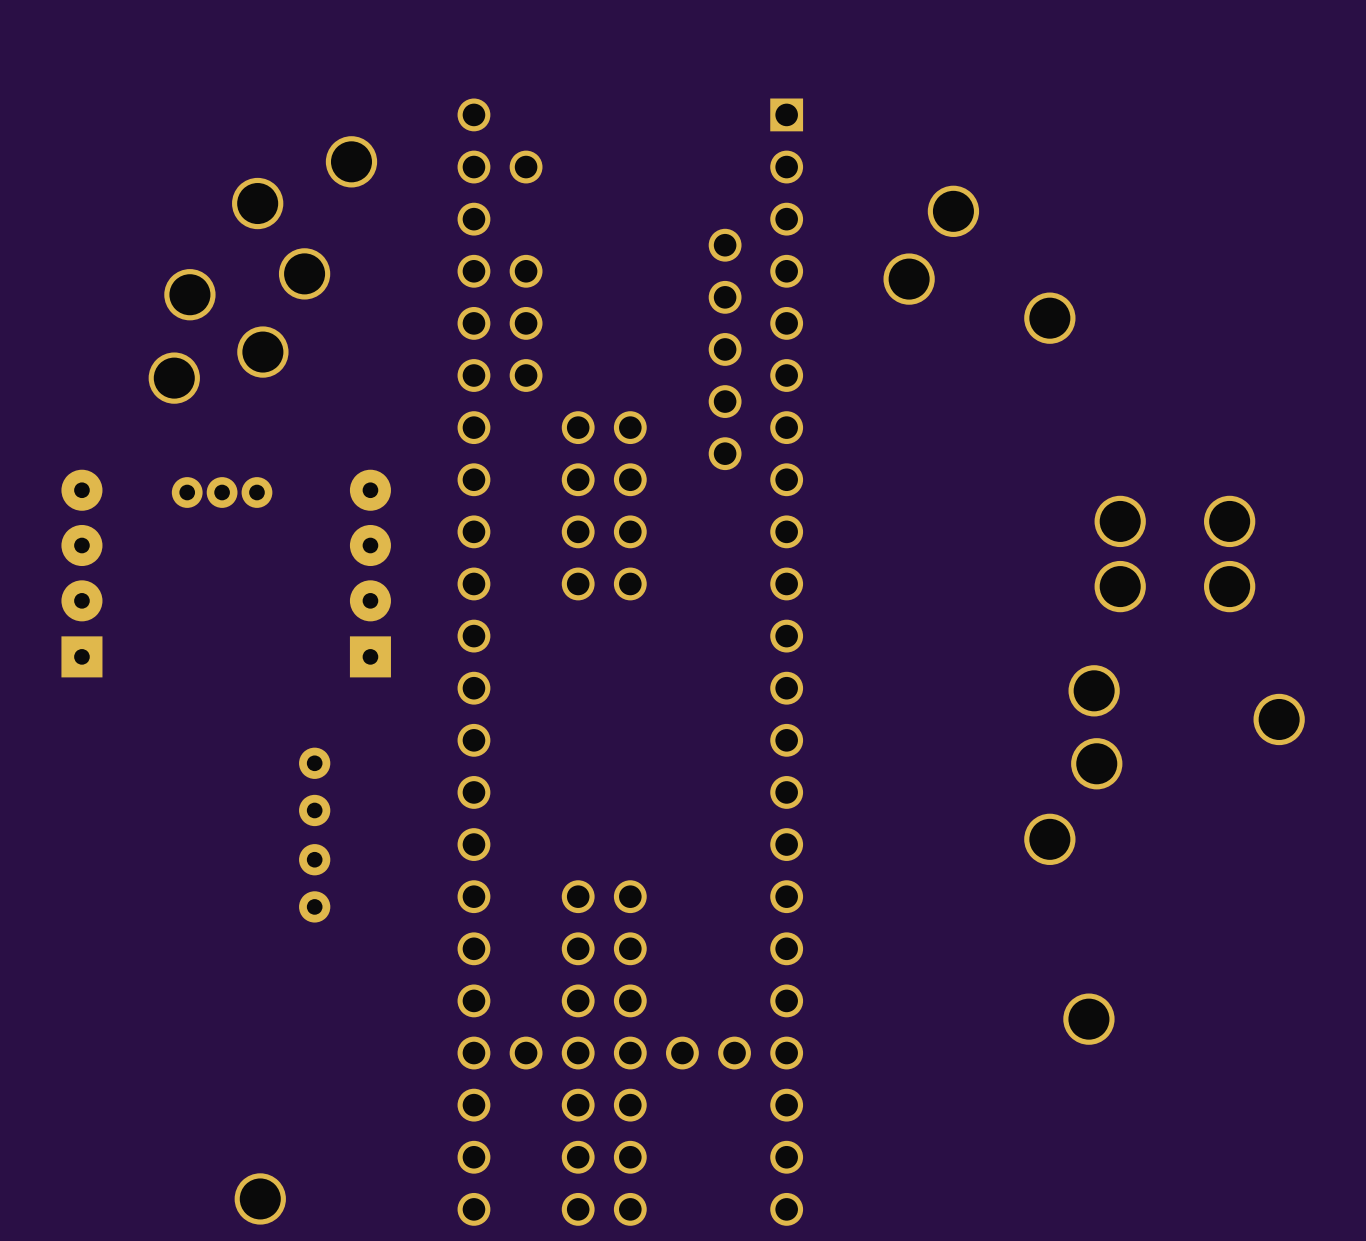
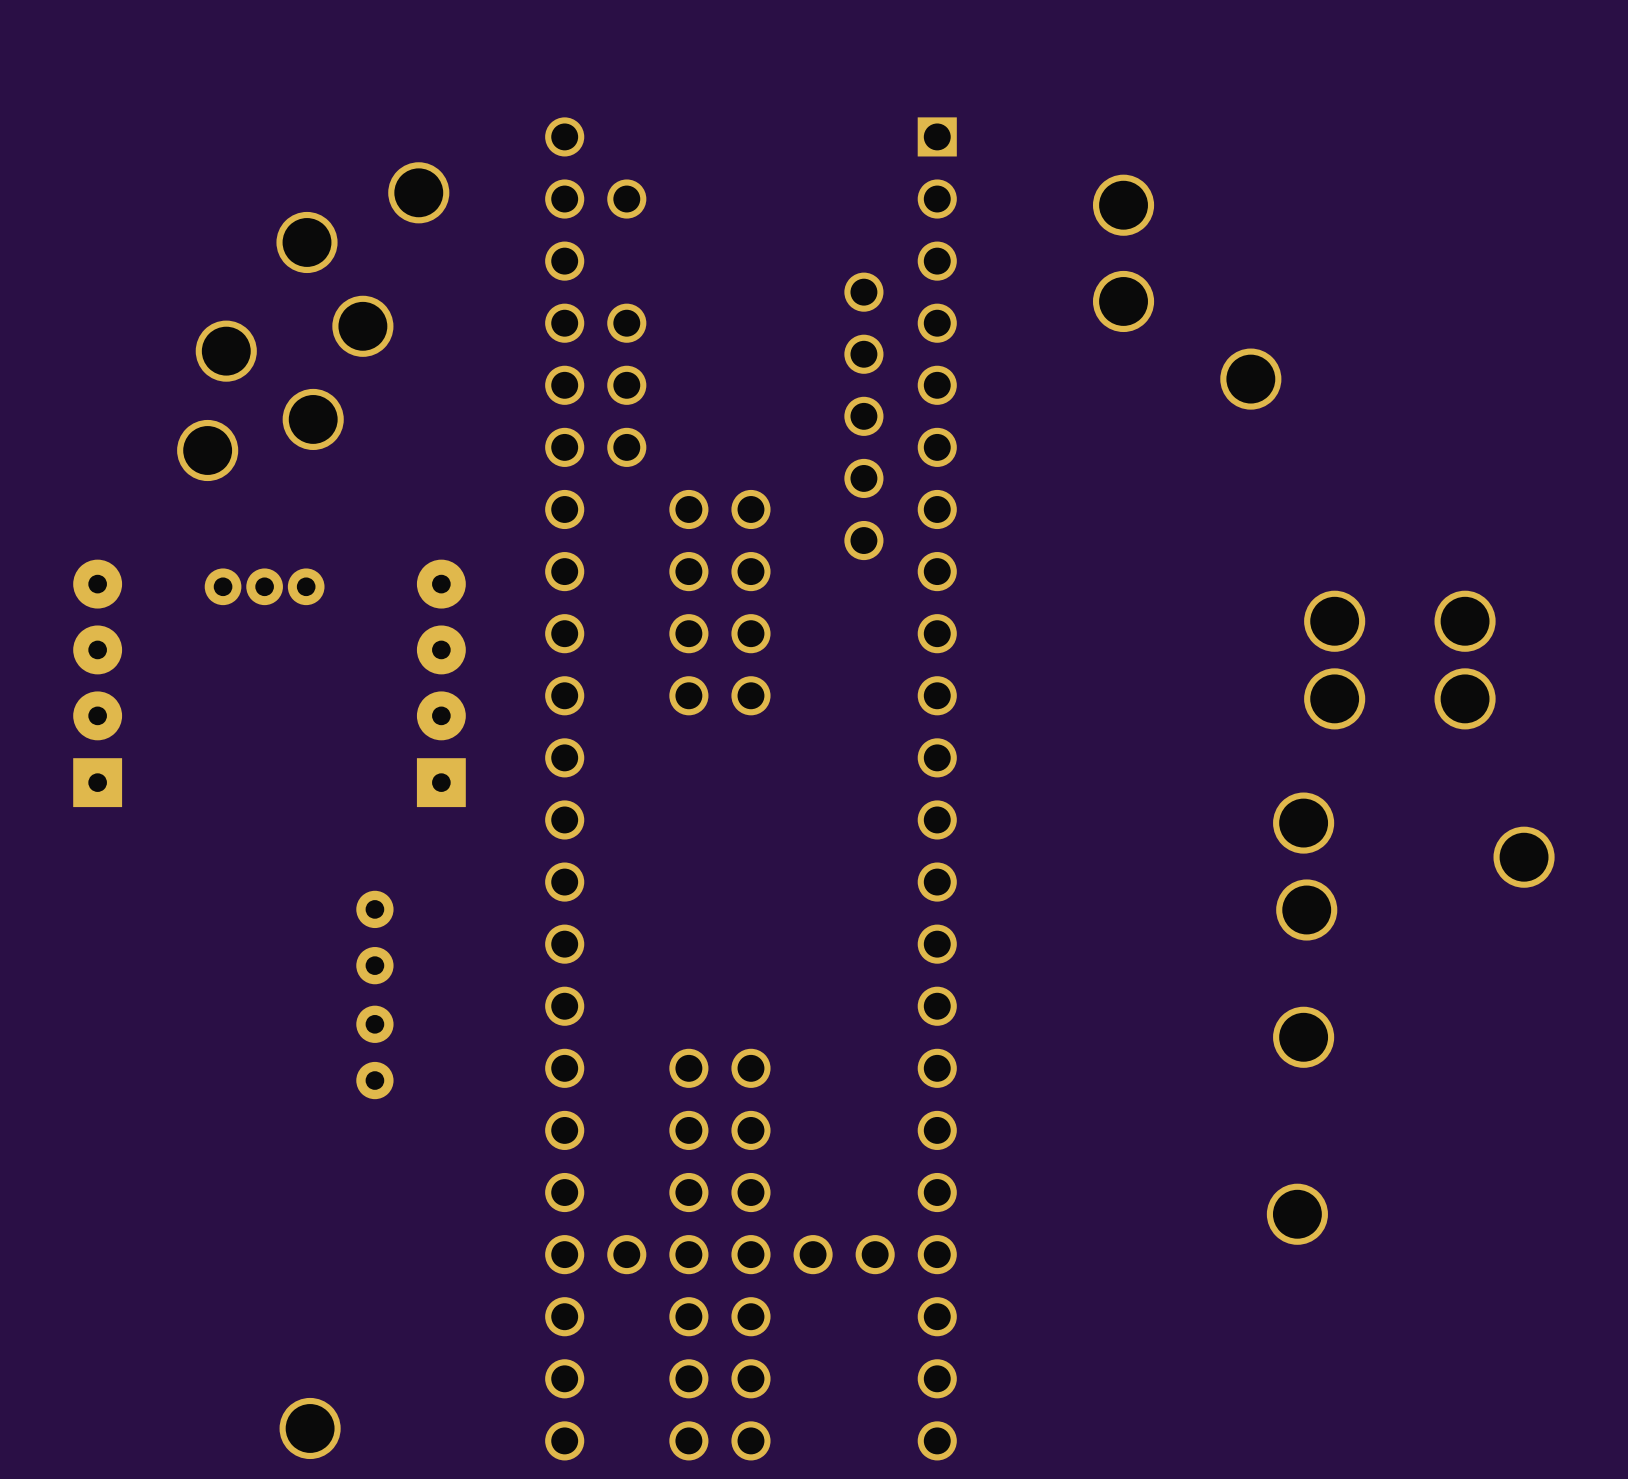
part: none -> (1123, 205)
part: (953, 211) -> none
part: none -> (1123, 301)
part: (909, 279) -> none
part position: (1049, 839) -> (1303, 1037)

